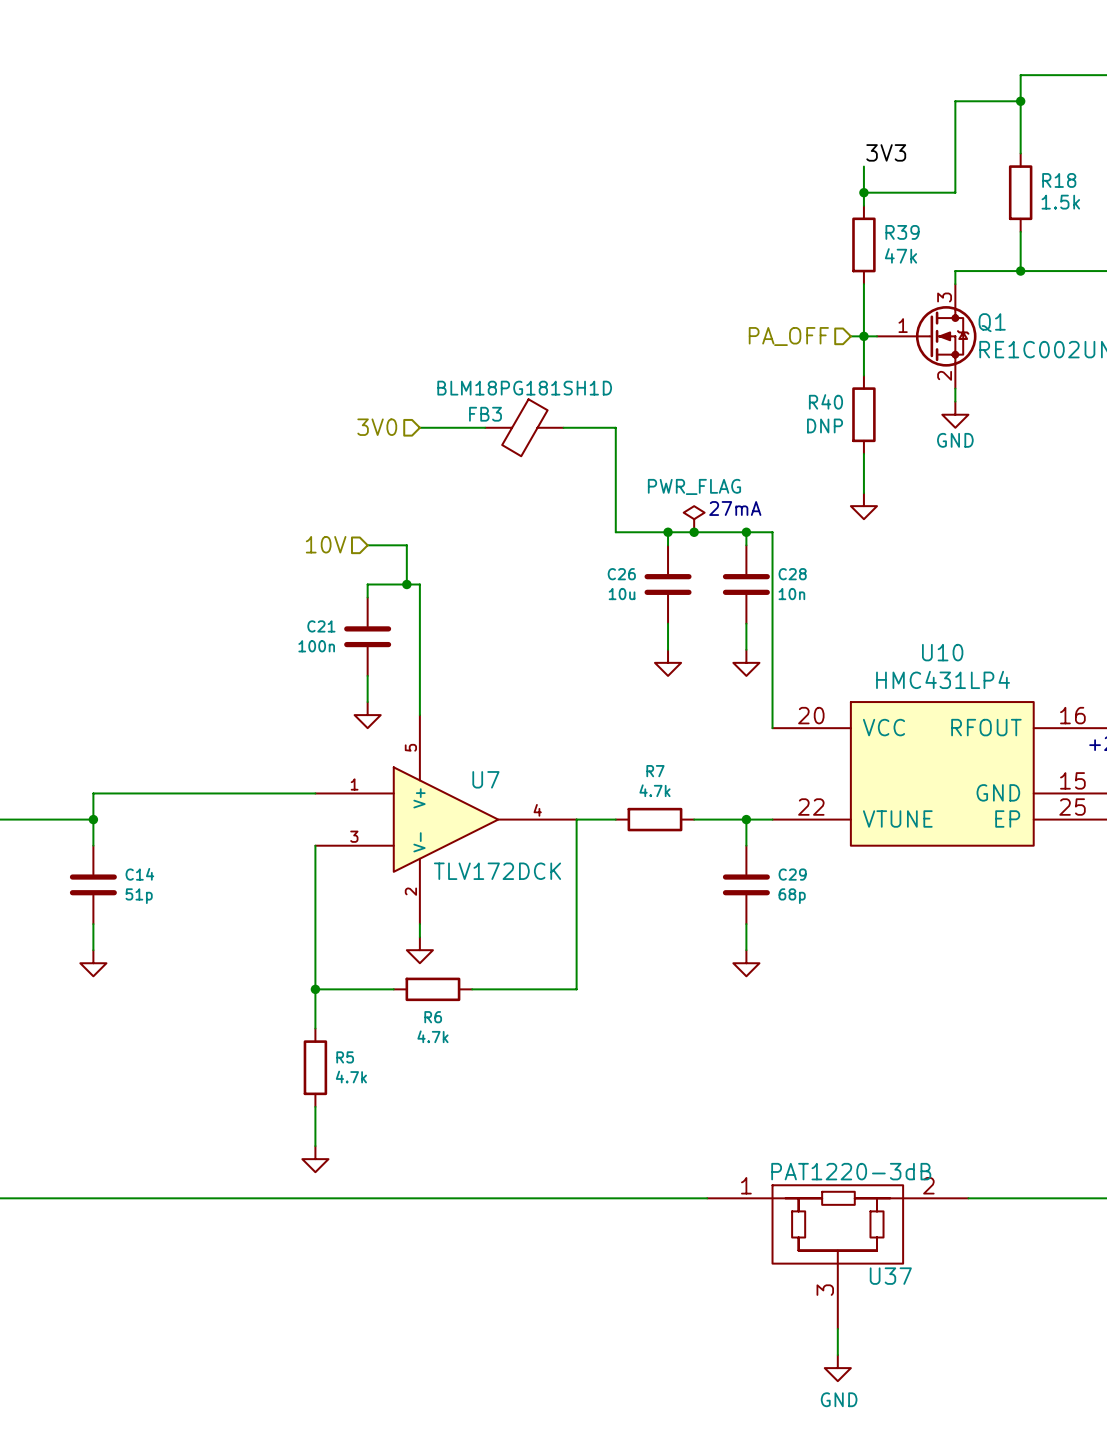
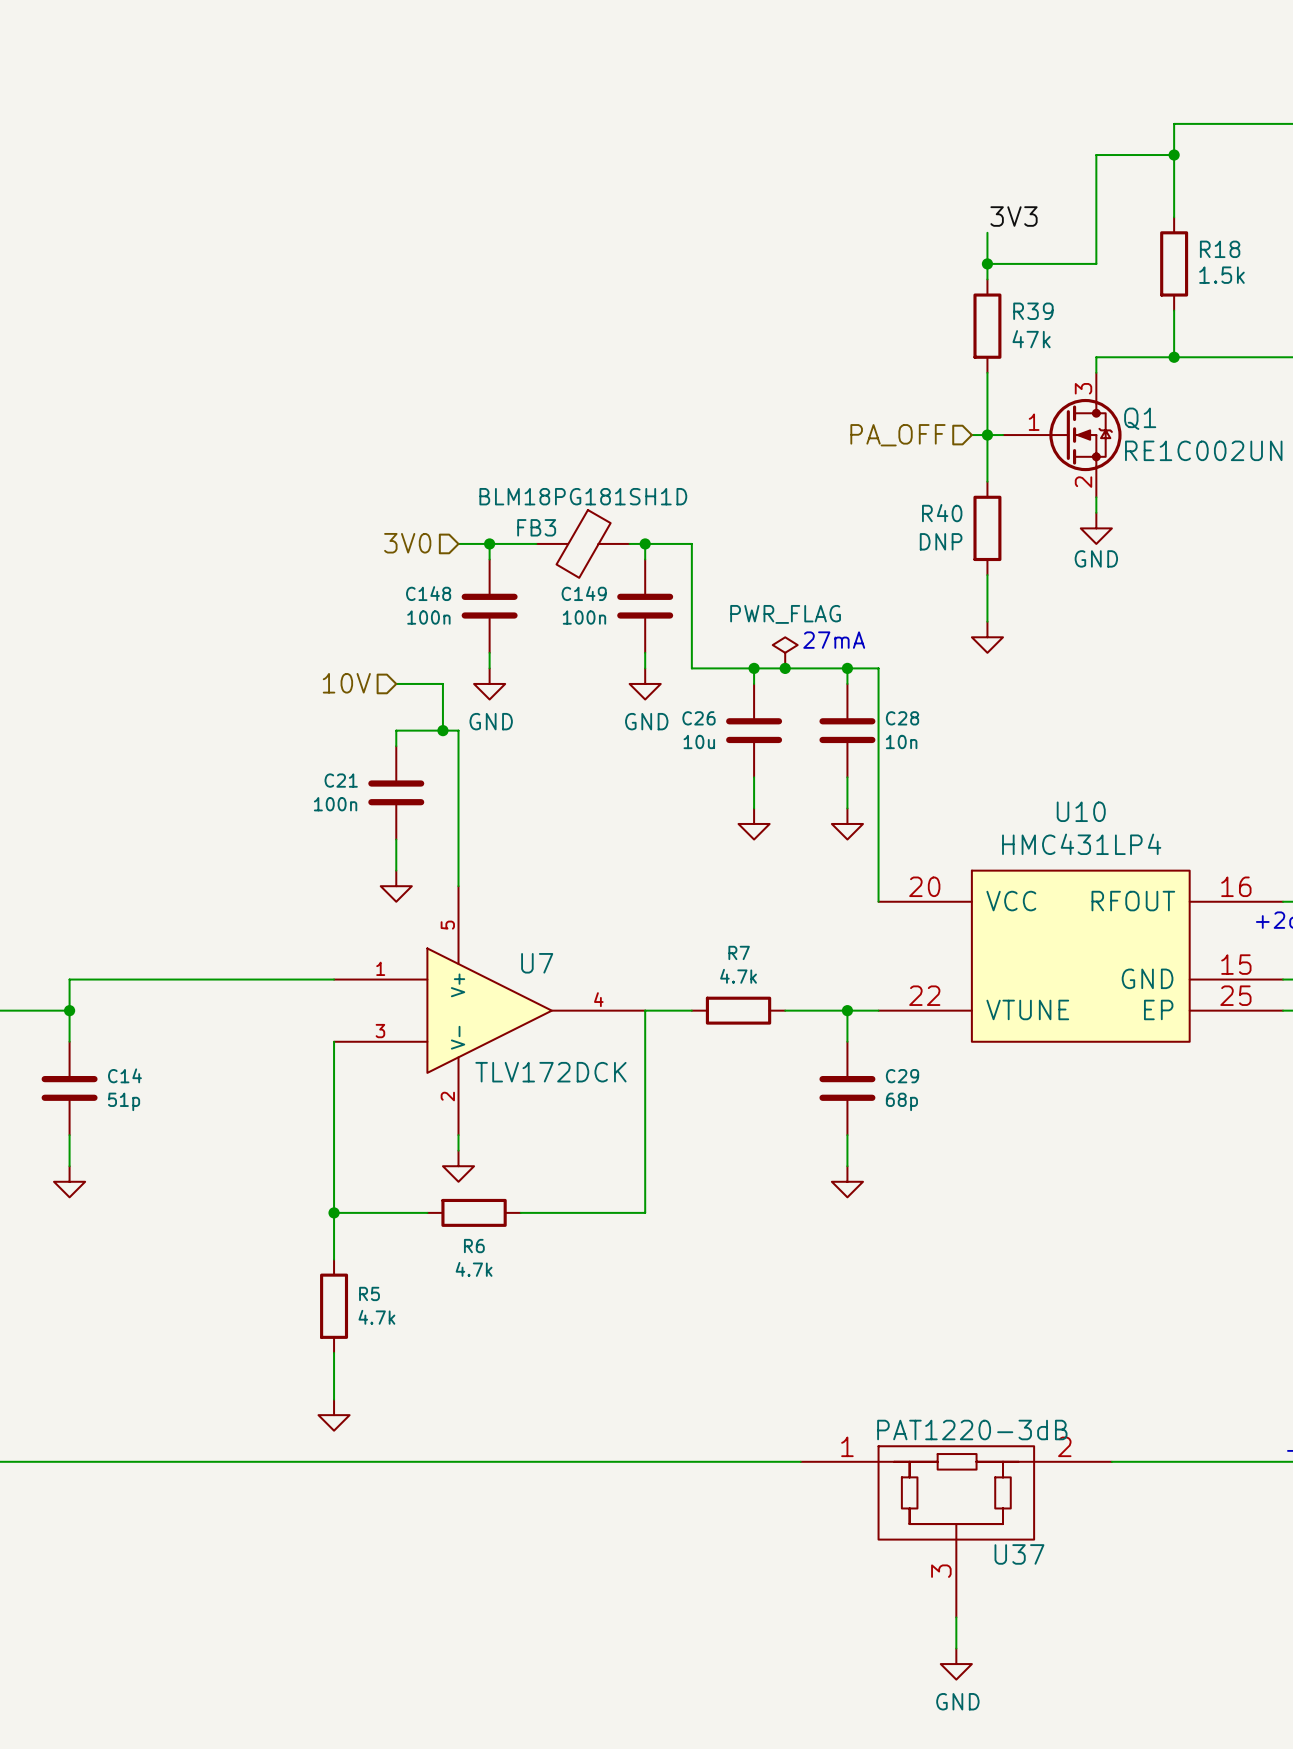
wire: none -> (489, 543) (489, 559)
junction: none -> (489, 543)
wire: none -> (645, 543) (645, 559)
junction: none -> (645, 543)
C148: none -> 100n (489, 606)
C149: none -> 100n (645, 606)
wire: none -> (489, 652) (489, 668)
wire: none -> (645, 652) (645, 668)
power symbol: none -> GND (489, 683)
power symbol: none -> GND (645, 683)

